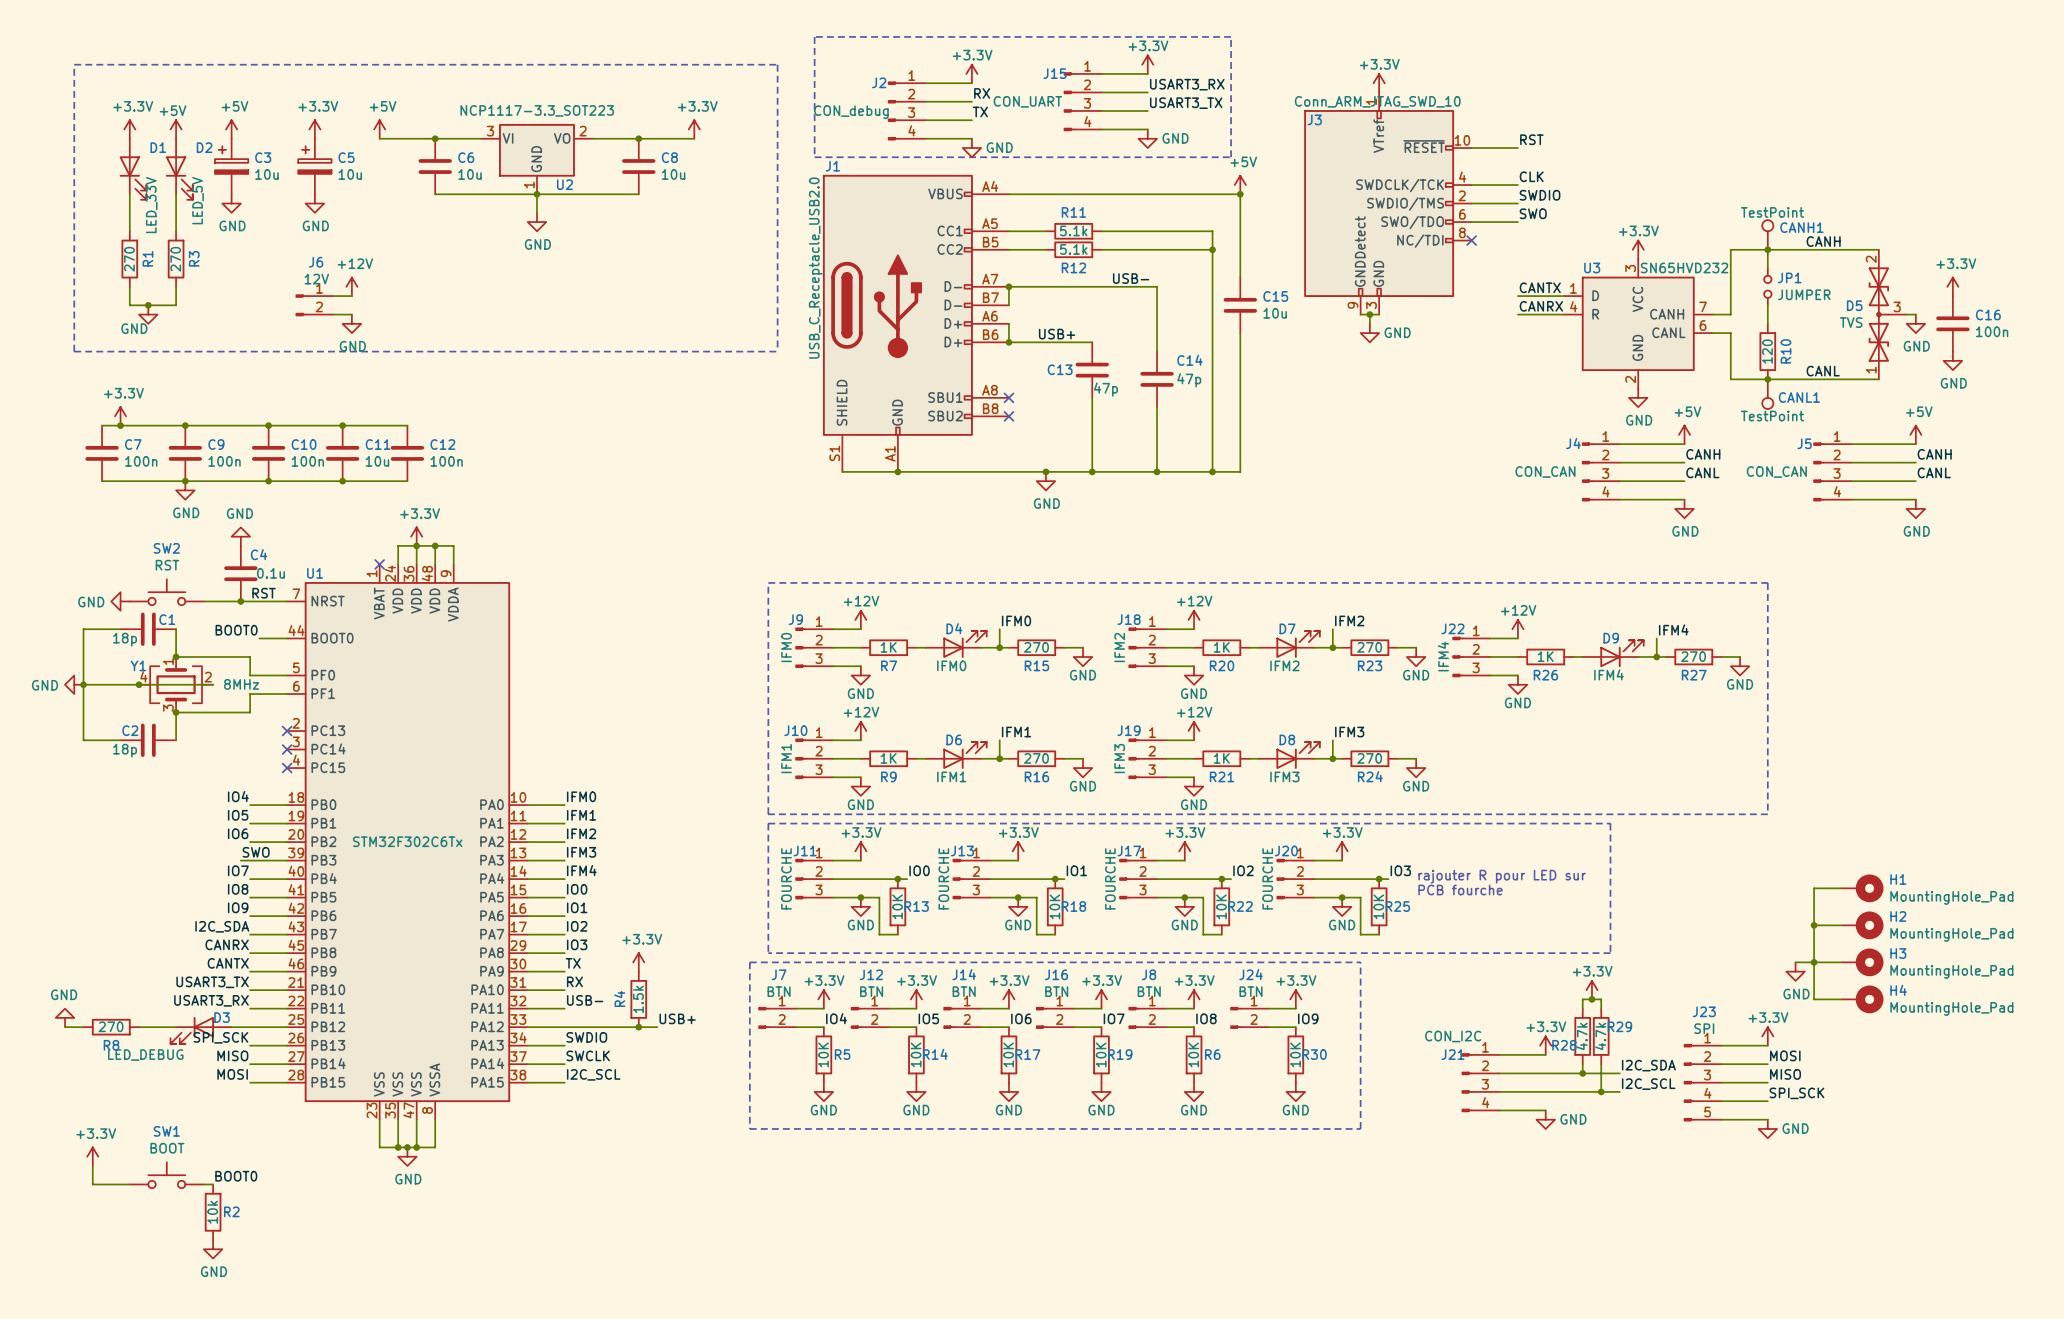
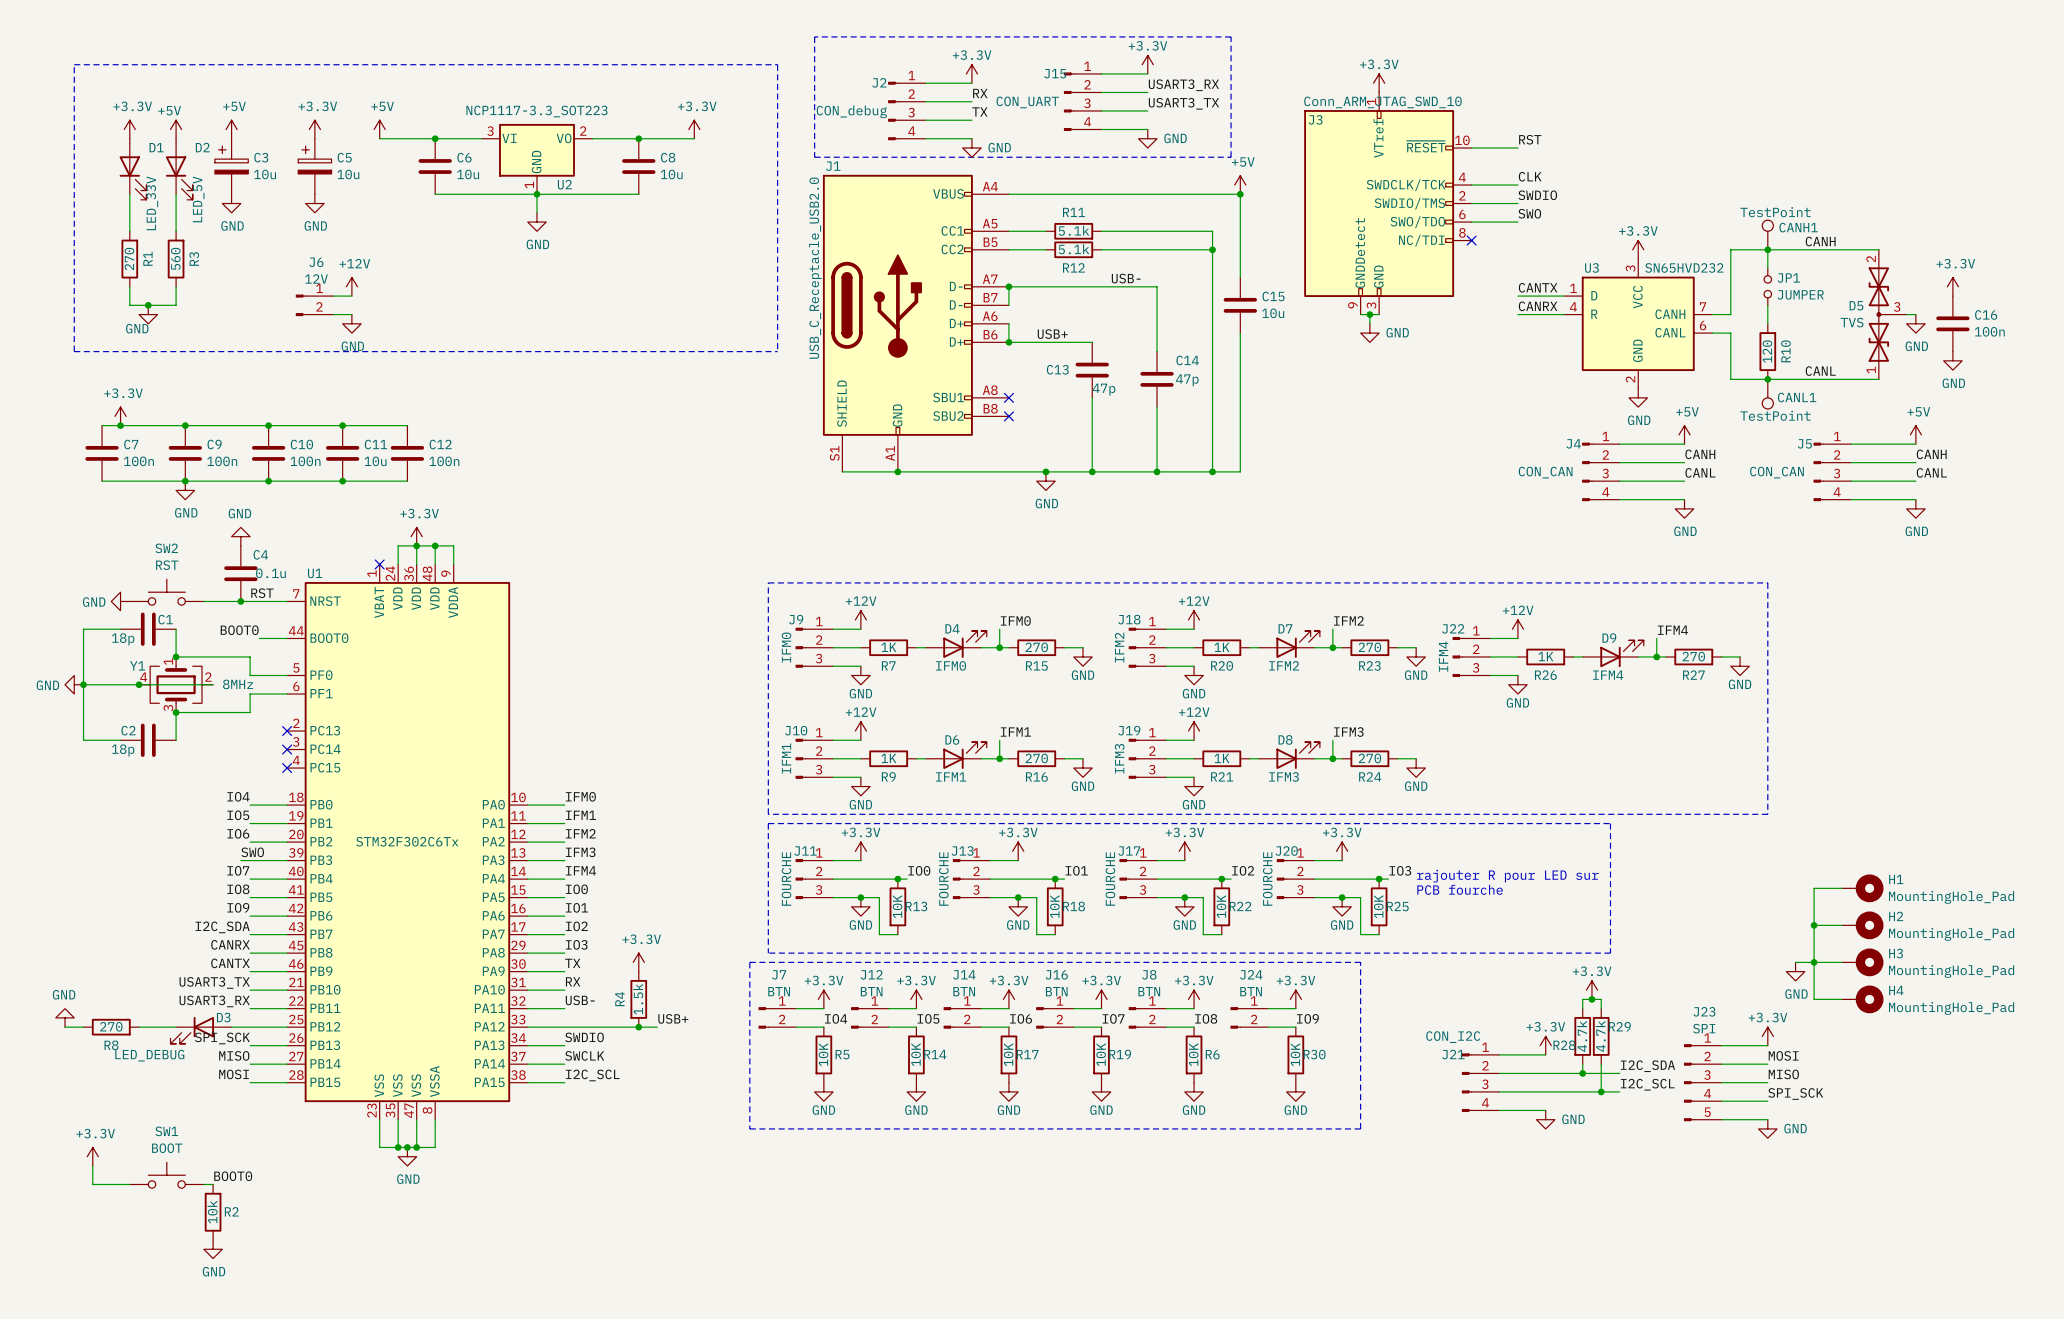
R3 value: 270 (175, 259) -> 560 (175, 258)

